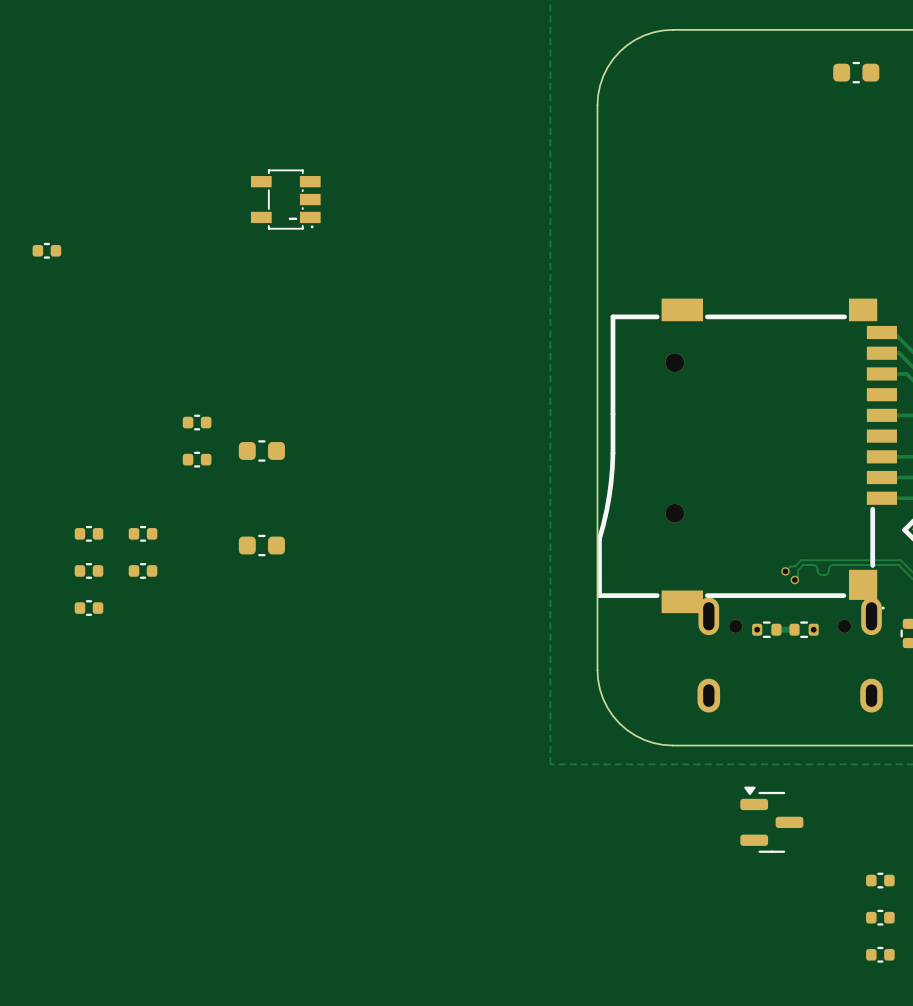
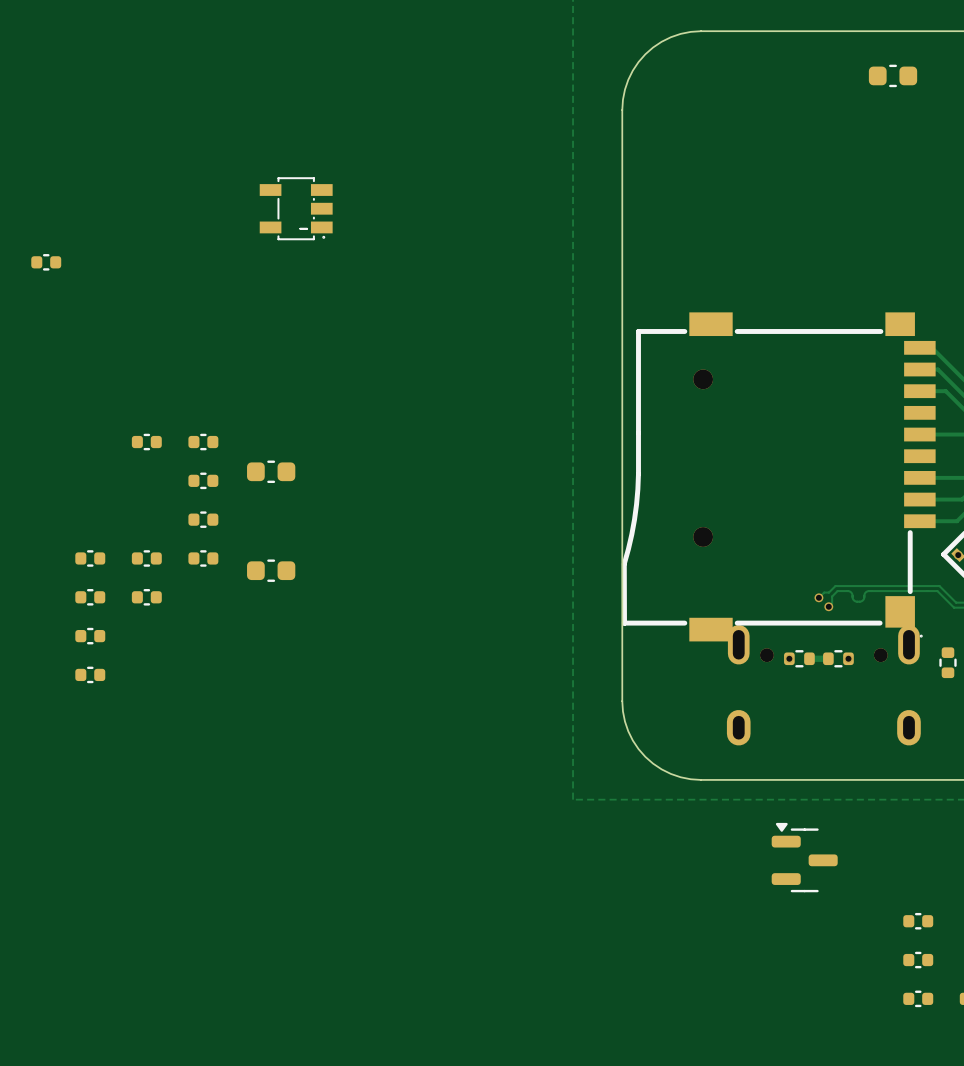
part: none -> (146, 442)
part: none -> (203, 519)
part: none -> (203, 558)
part: none -> (90, 674)

